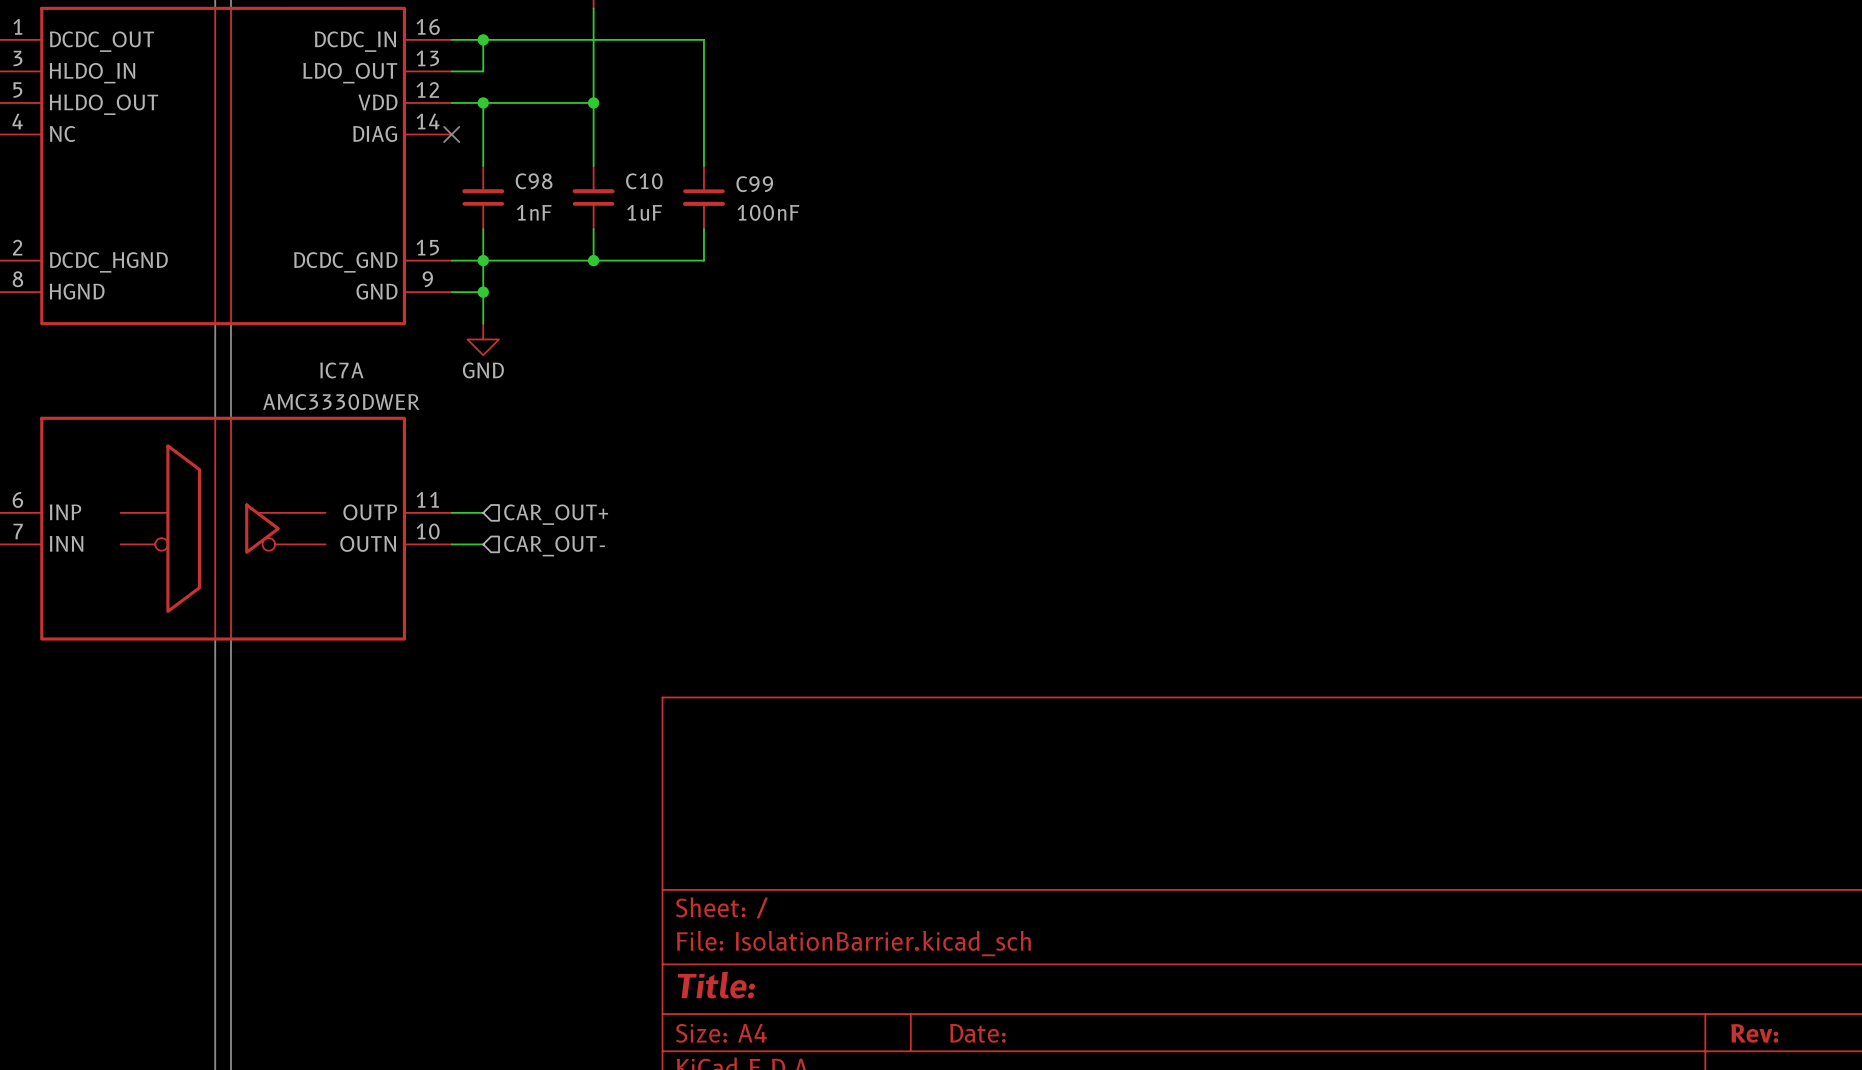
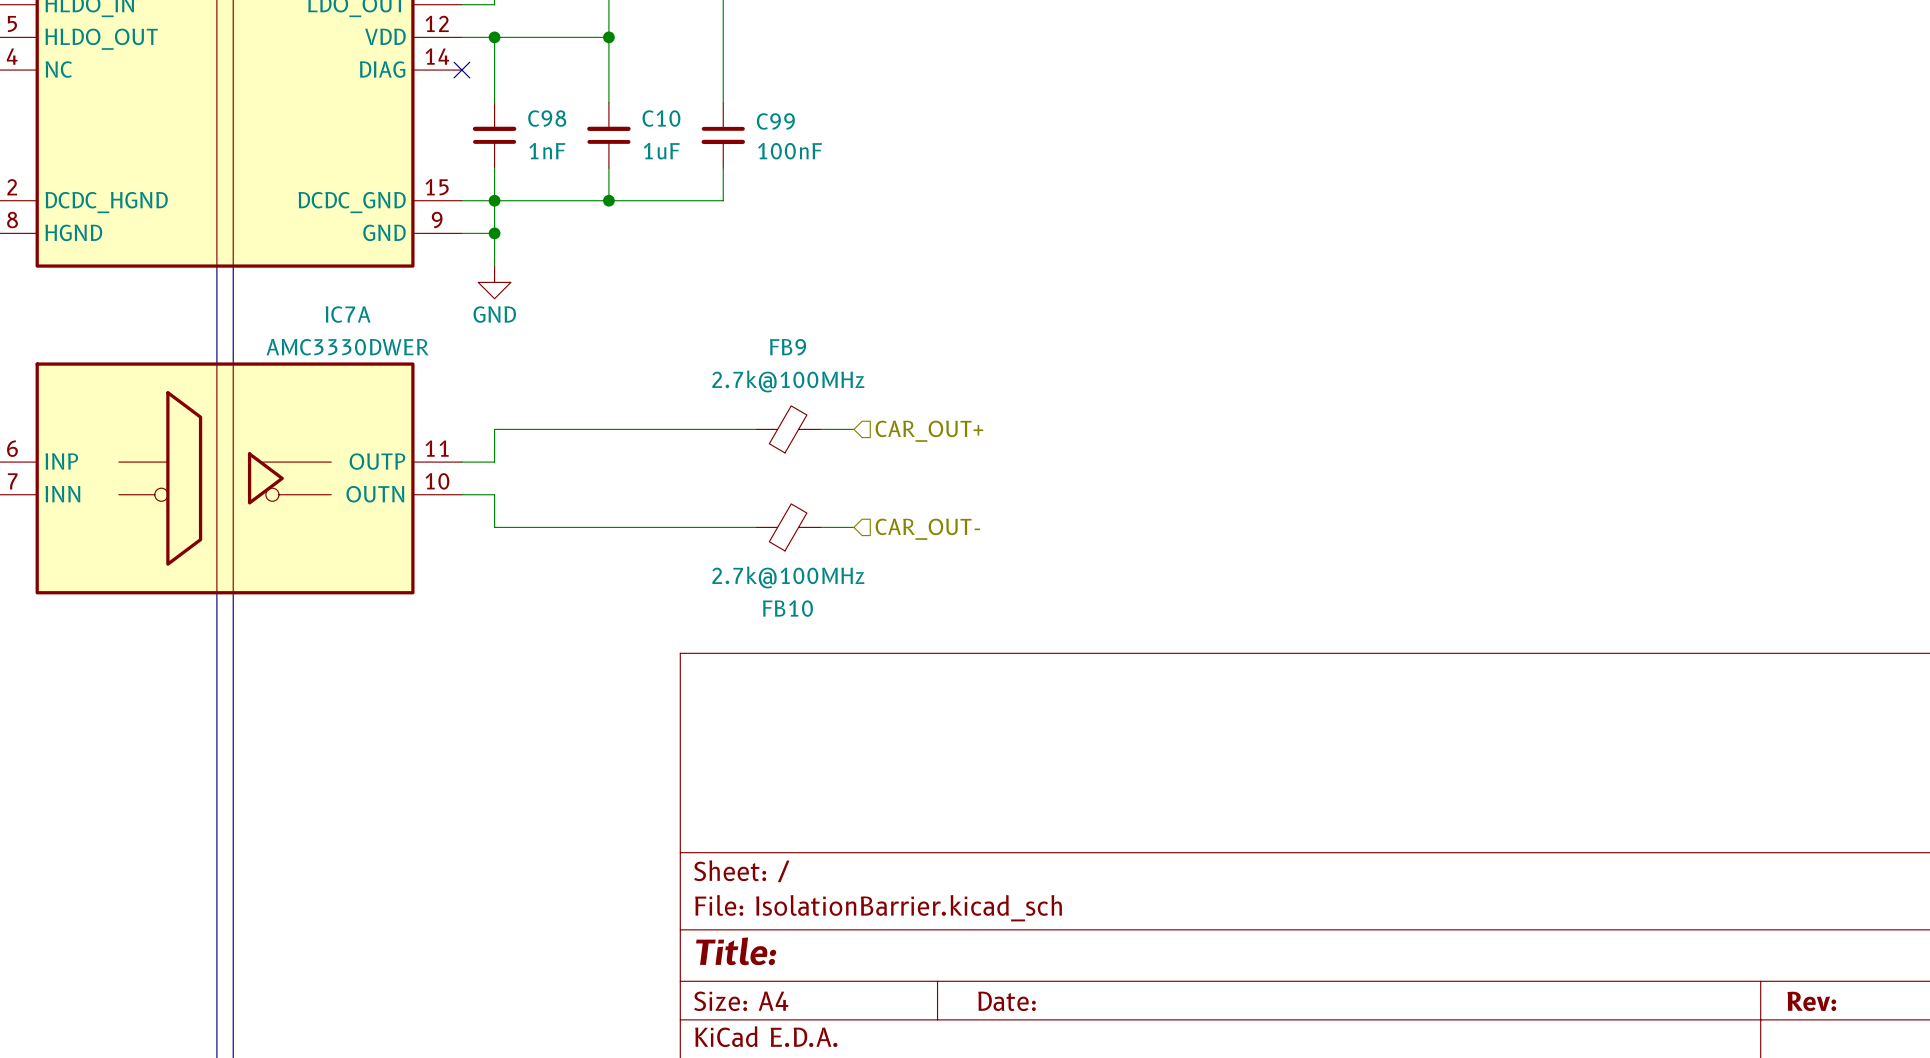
wire: none -> (755, 429) (494, 429) (494, 462)
FB9: none -> 2.7k@100MHz (788, 429)
wire: none -> (821, 429) (853, 429)
hierarchical label: none -> CAR_OUT+ (929, 431)
hierarchical label: CAR_OUT+ (556, 514) -> none
wire: none -> (494, 494) (494, 527) (755, 527)
hierarchical label: CAR_OUT- (554, 546) -> none
FB10: none -> 2.7k@100MHz (788, 527)
wire: none -> (821, 527) (853, 527)
hierarchical label: none -> CAR_OUT- (927, 529)

